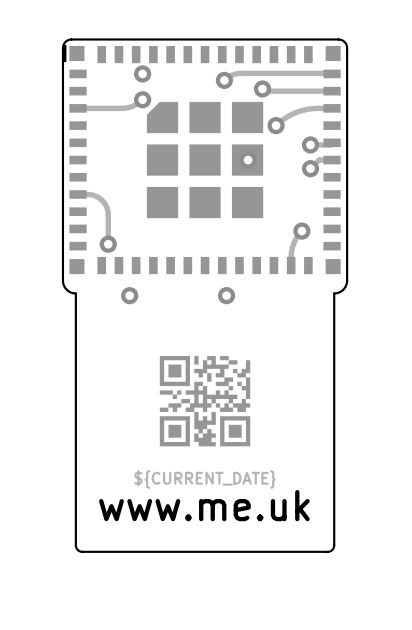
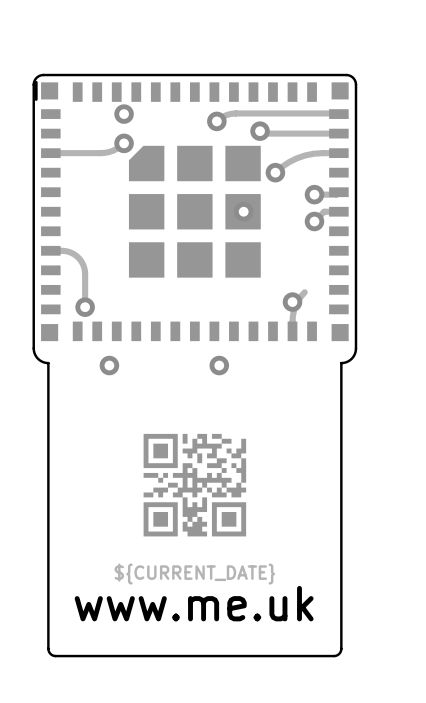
via position: (301, 231) -> (292, 302)

